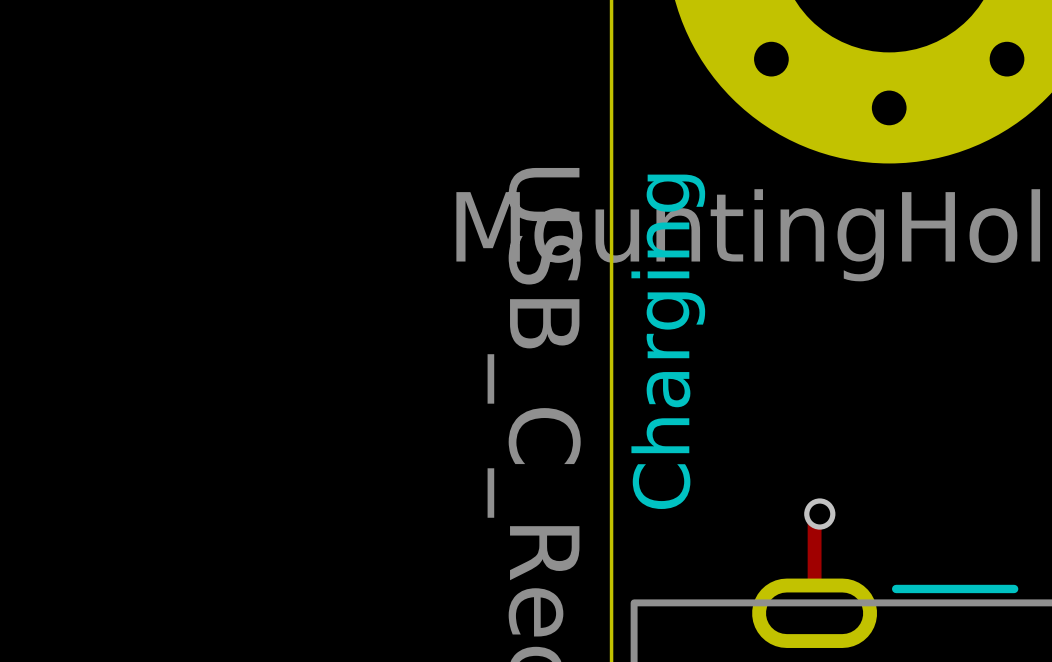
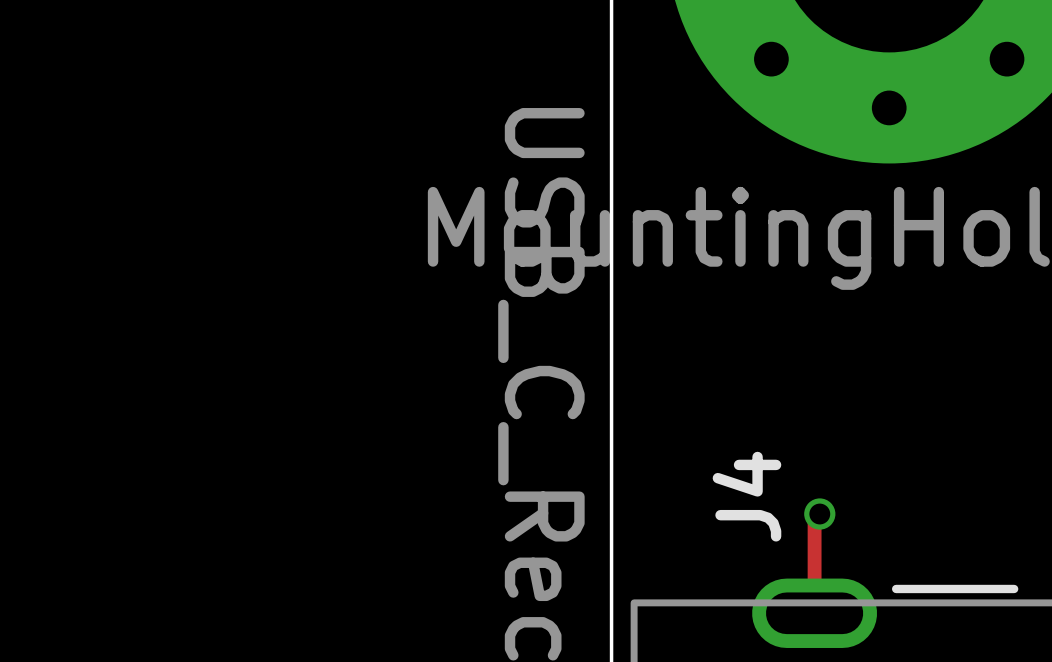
Charging name: Charging (668, 341) -> J4 (746, 496)

